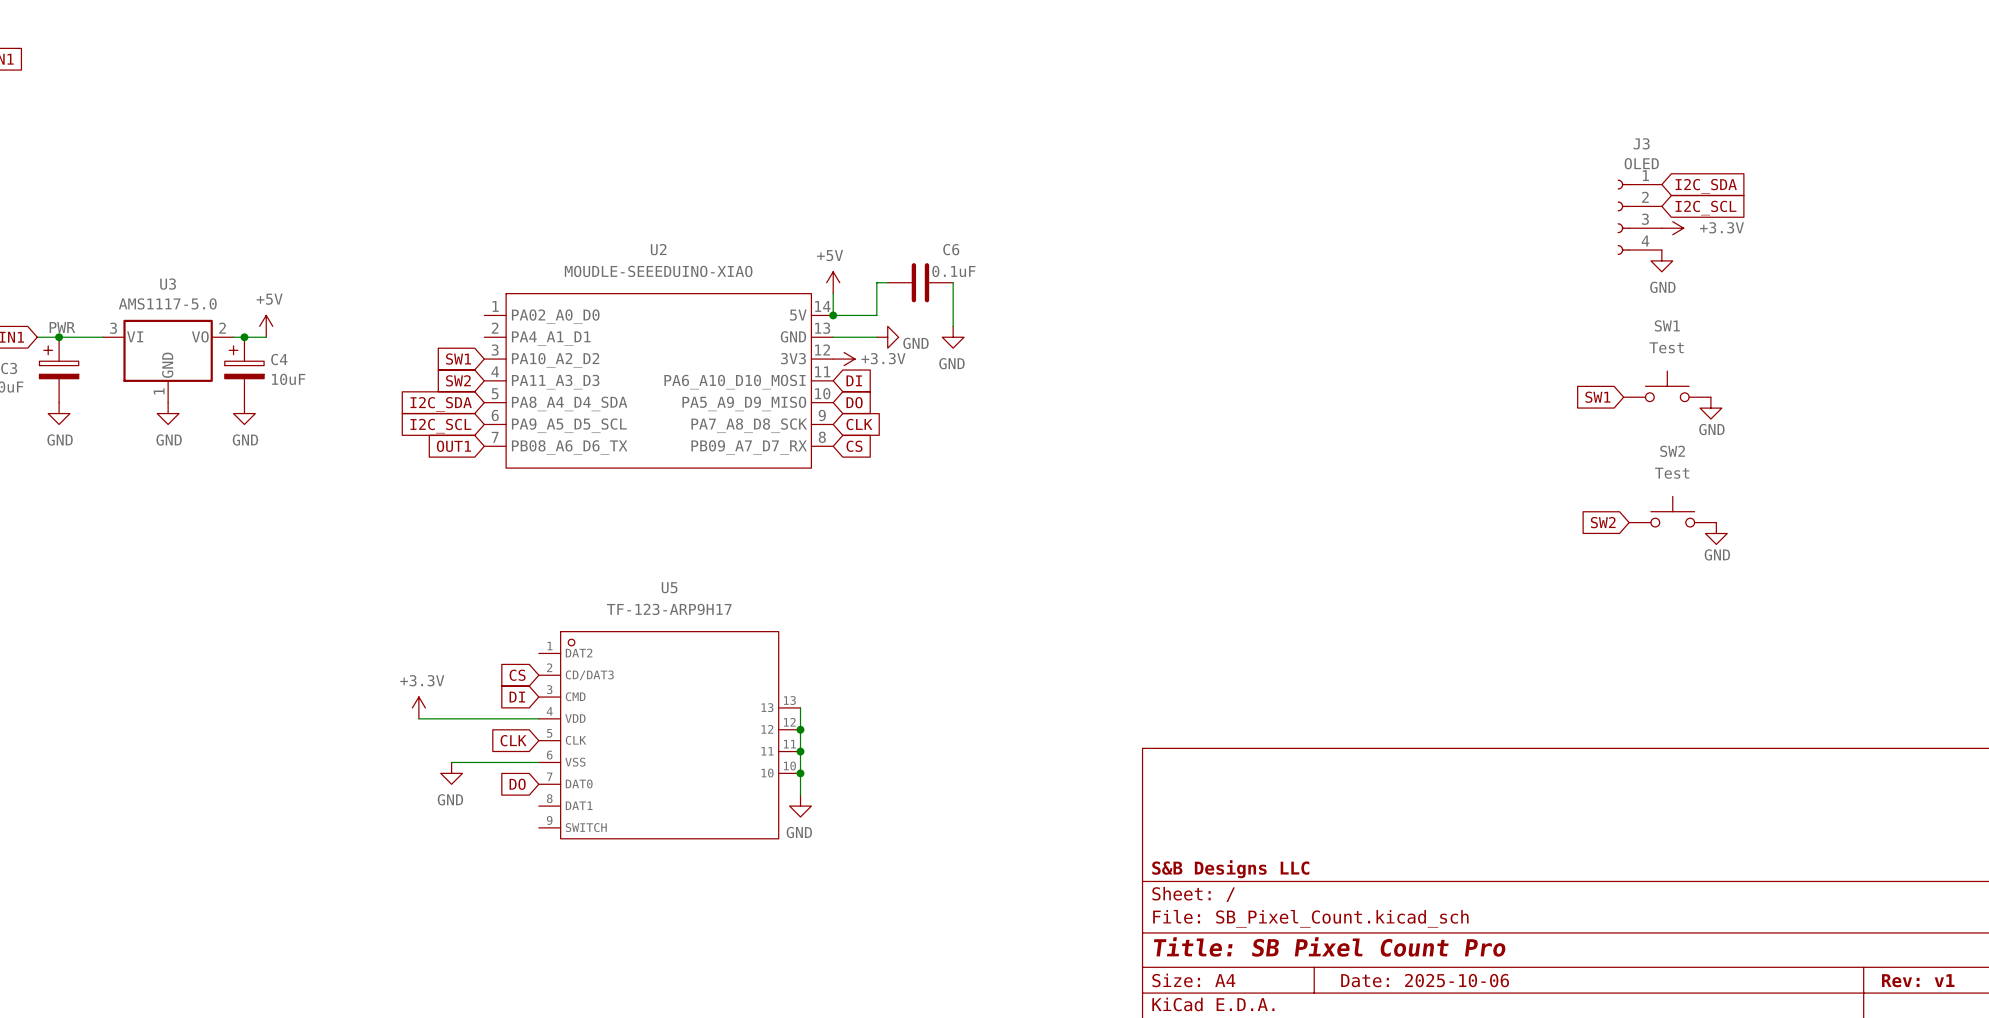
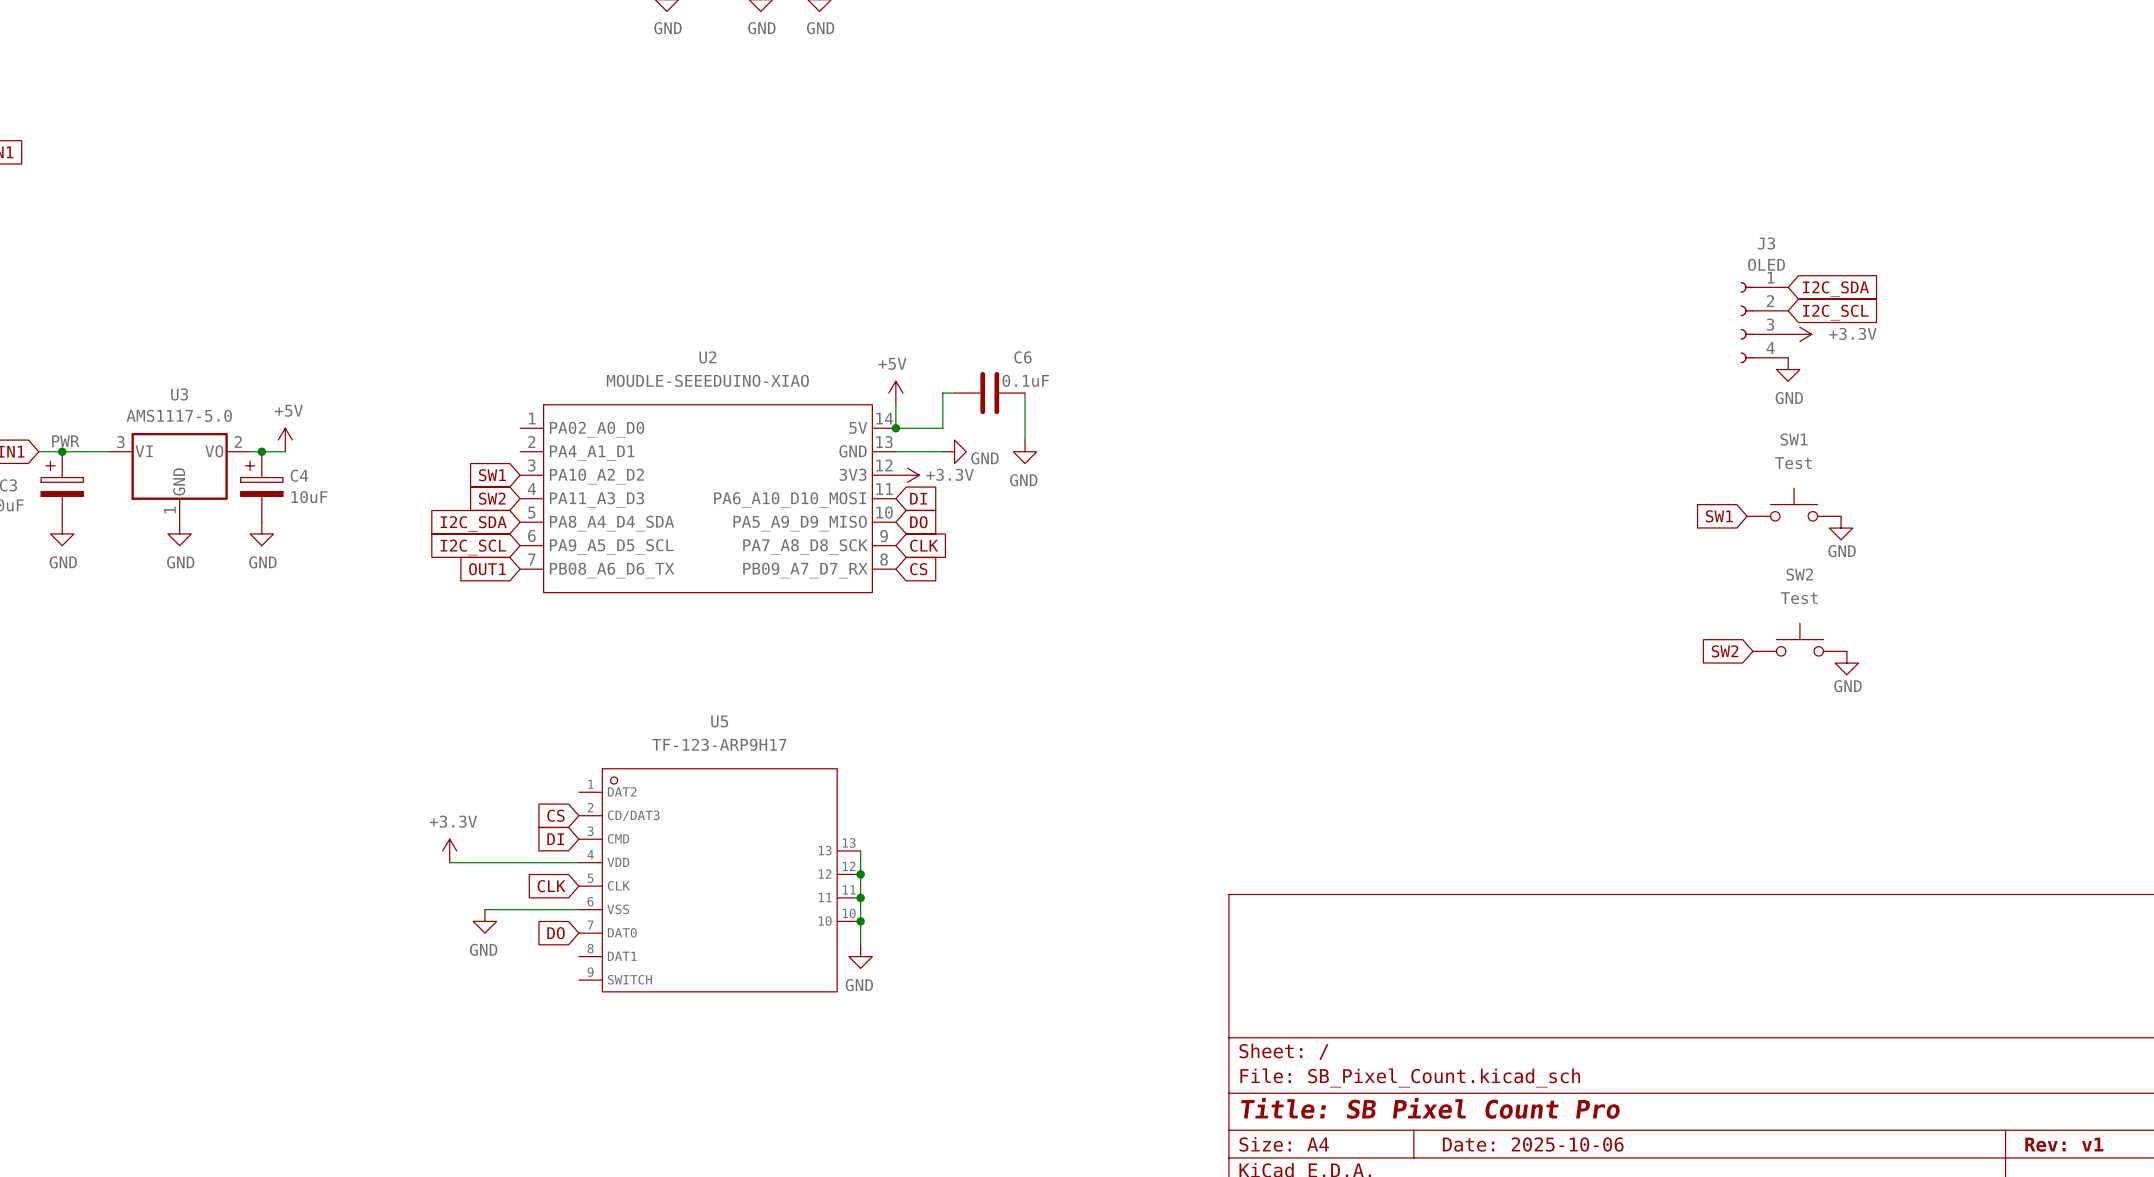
title block: S&B Designs LLC (1230, 869) -> none

